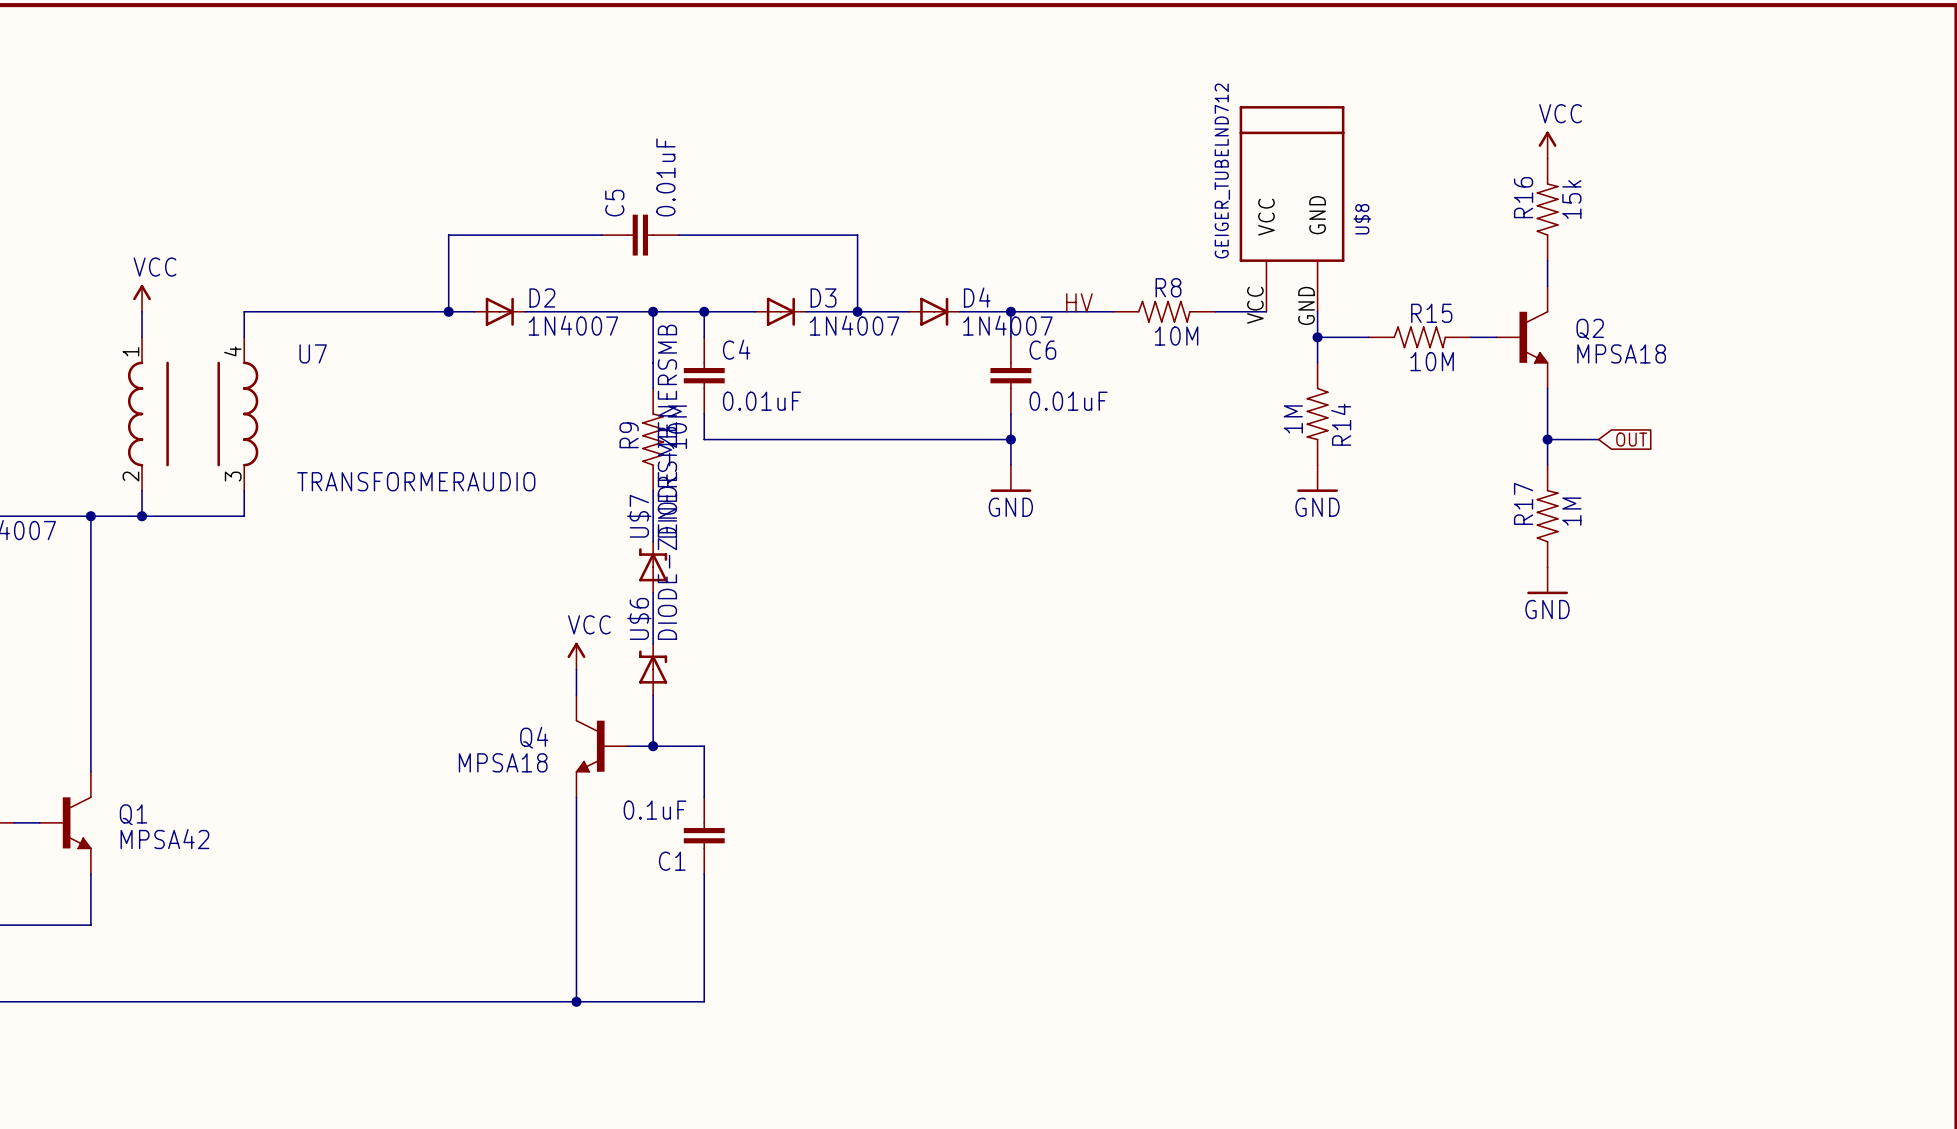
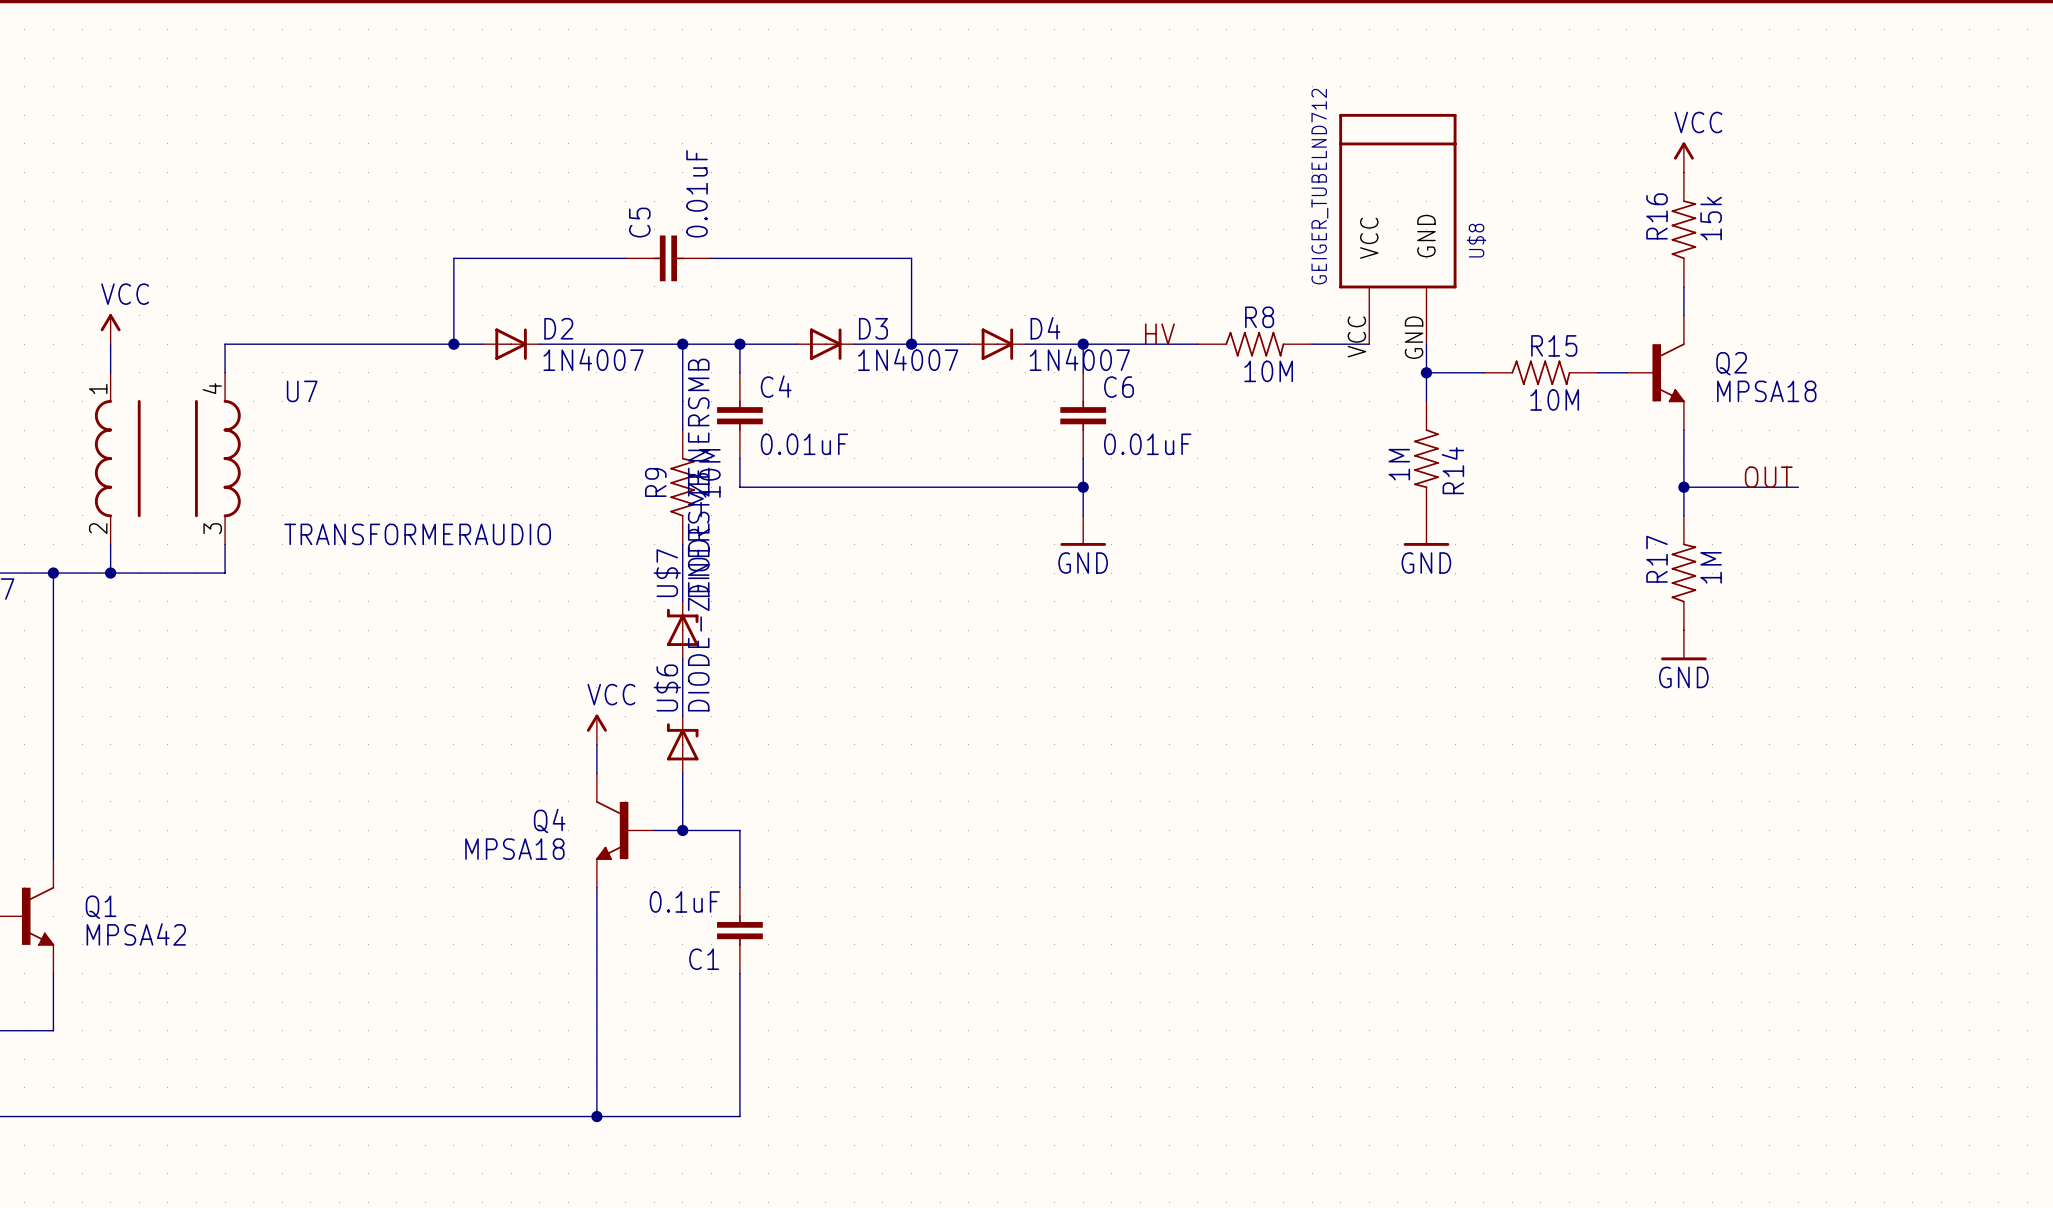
label: none -> OUT (1768, 477)
wire: none -> (1741, 487) (1798, 487)
global label: OUT (1631, 439) -> none

